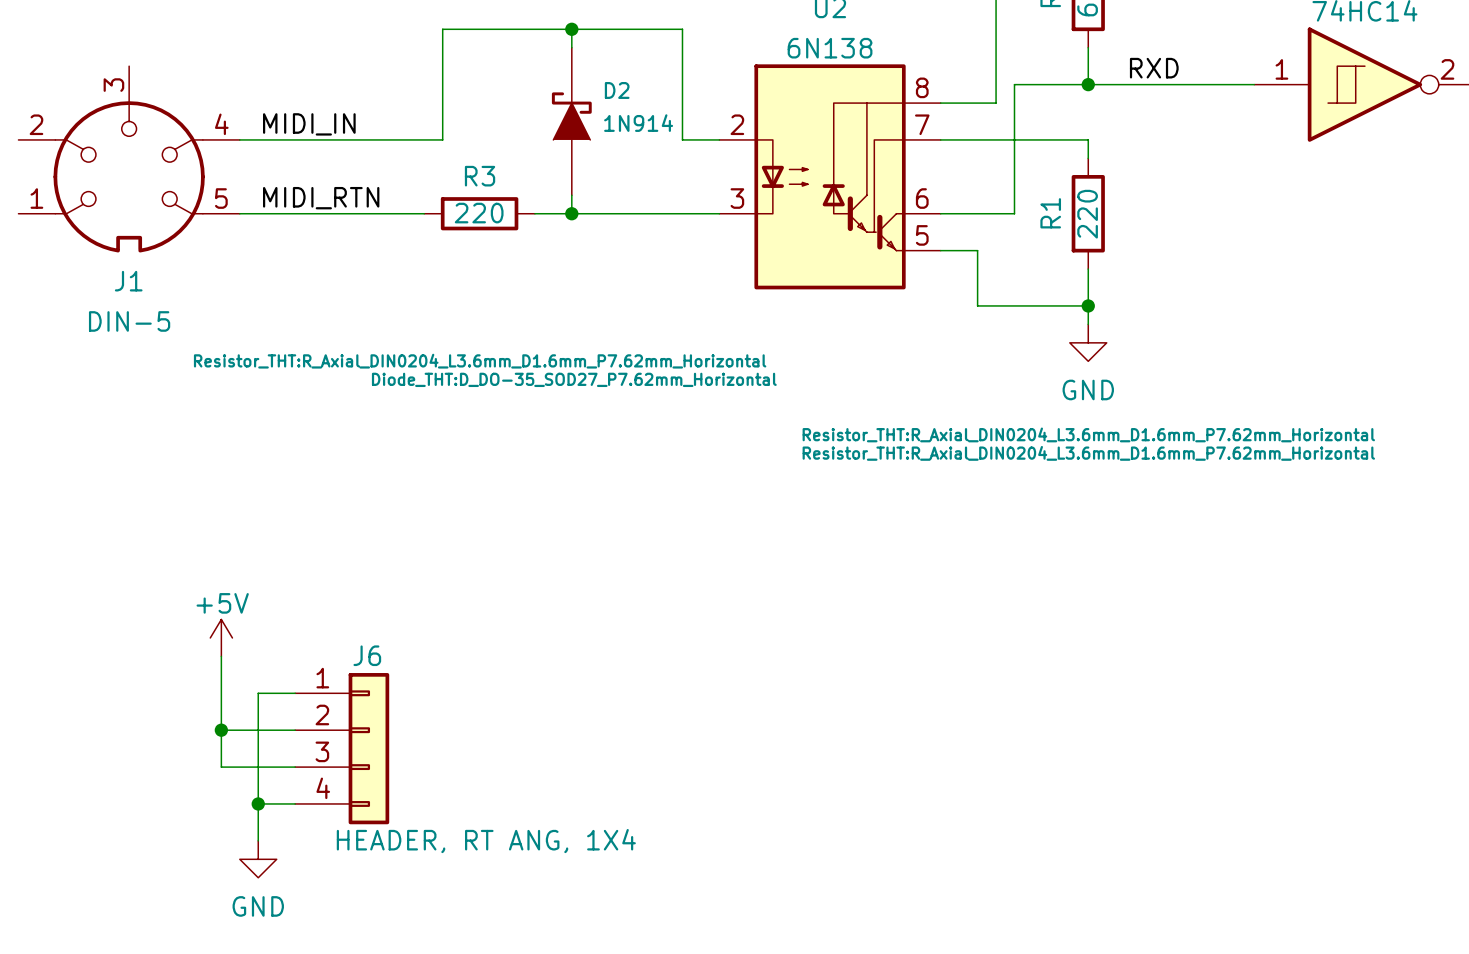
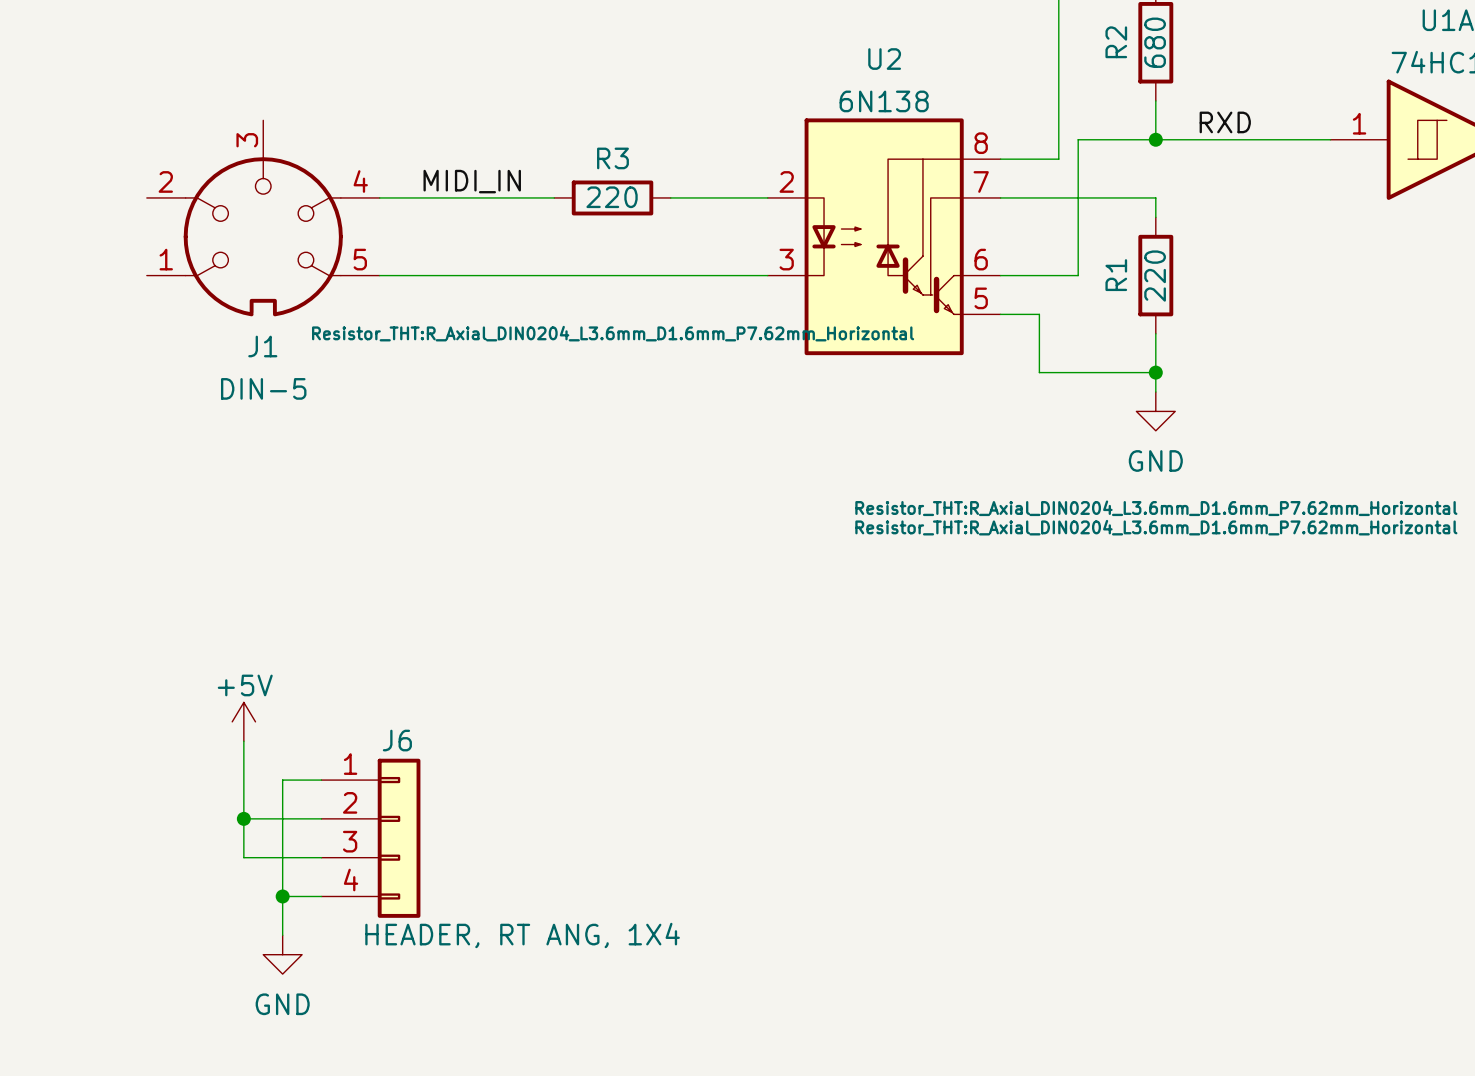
wire: (571, 29) (571, 47) -> none
junction: (571, 29) -> none
D2: 1N914 (571, 121) -> none
label position: MIDI_IN (309, 124) -> MIDI_IN (472, 181)
wire: (239, 139) (350, 139) -> none
wire: (442, 139) (442, 29) (682, 29) (682, 139) -> (476, 197) (554, 197)
wire: none -> (670, 197) (728, 197)
J1 position: (129, 159) -> (263, 218)
wire: (571, 195) (571, 213) -> none
label: MIDI_RTN (321, 198) -> none
wire: (239, 213) (350, 213) -> (457, 275) (573, 275)
R3 position: (479, 213) -> (612, 197)
junction: (571, 213) -> none
R3 text position: Resistor_THT:R_Axial_DIN0204_L3.6mm_D1.6mm_P7.62mm_Horizontal (480, 361) -> Resistor_THT:R_Axial_DIN0204_L3.6mm_D1.6mm_P7.62mm_Horizontal (613, 333)

